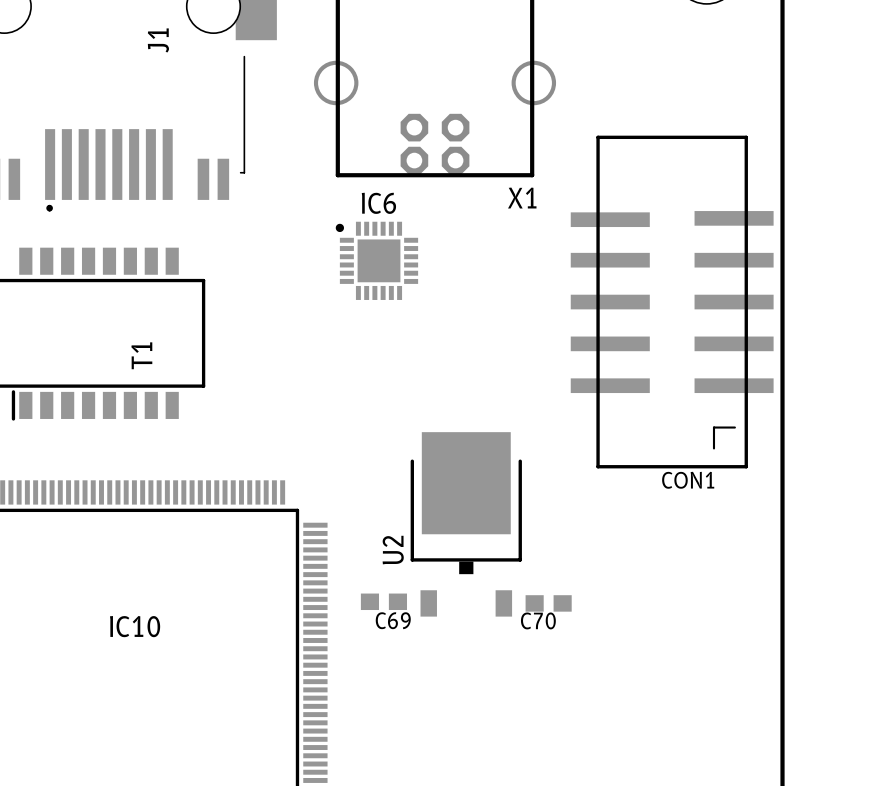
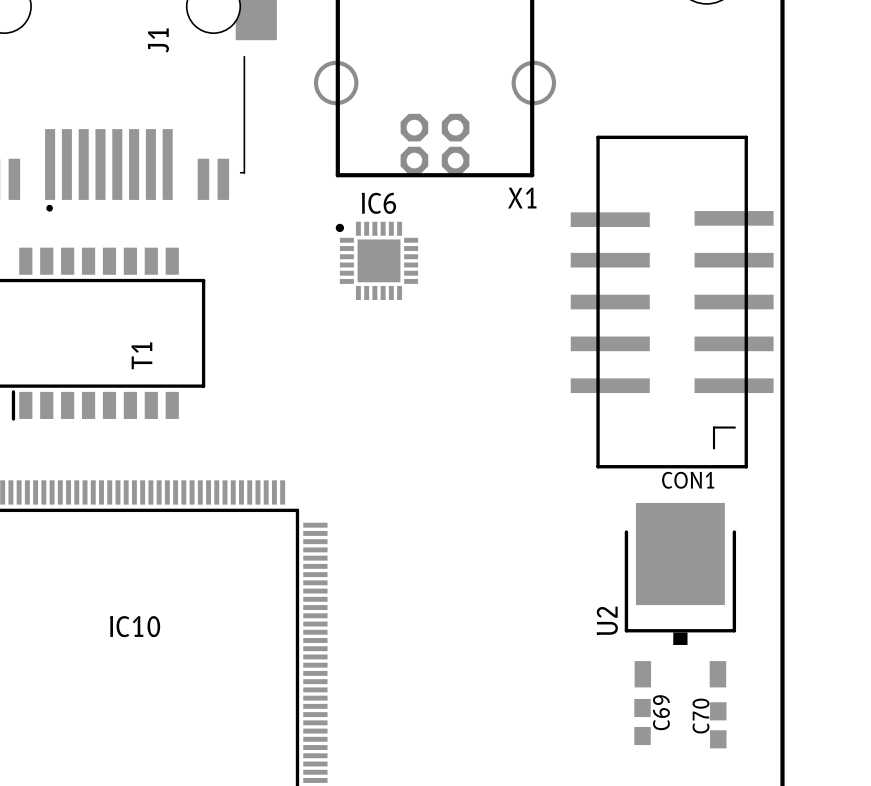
U2 position: (466, 524) -> (680, 595)
C69 rotation: 0° (383, 601) -> 90° clockwise (642, 722)
C69 position: (383, 601) -> (642, 722)
C70 rotation: 0° (548, 603) -> 90° clockwise (718, 725)
C70 position: (548, 603) -> (718, 725)

